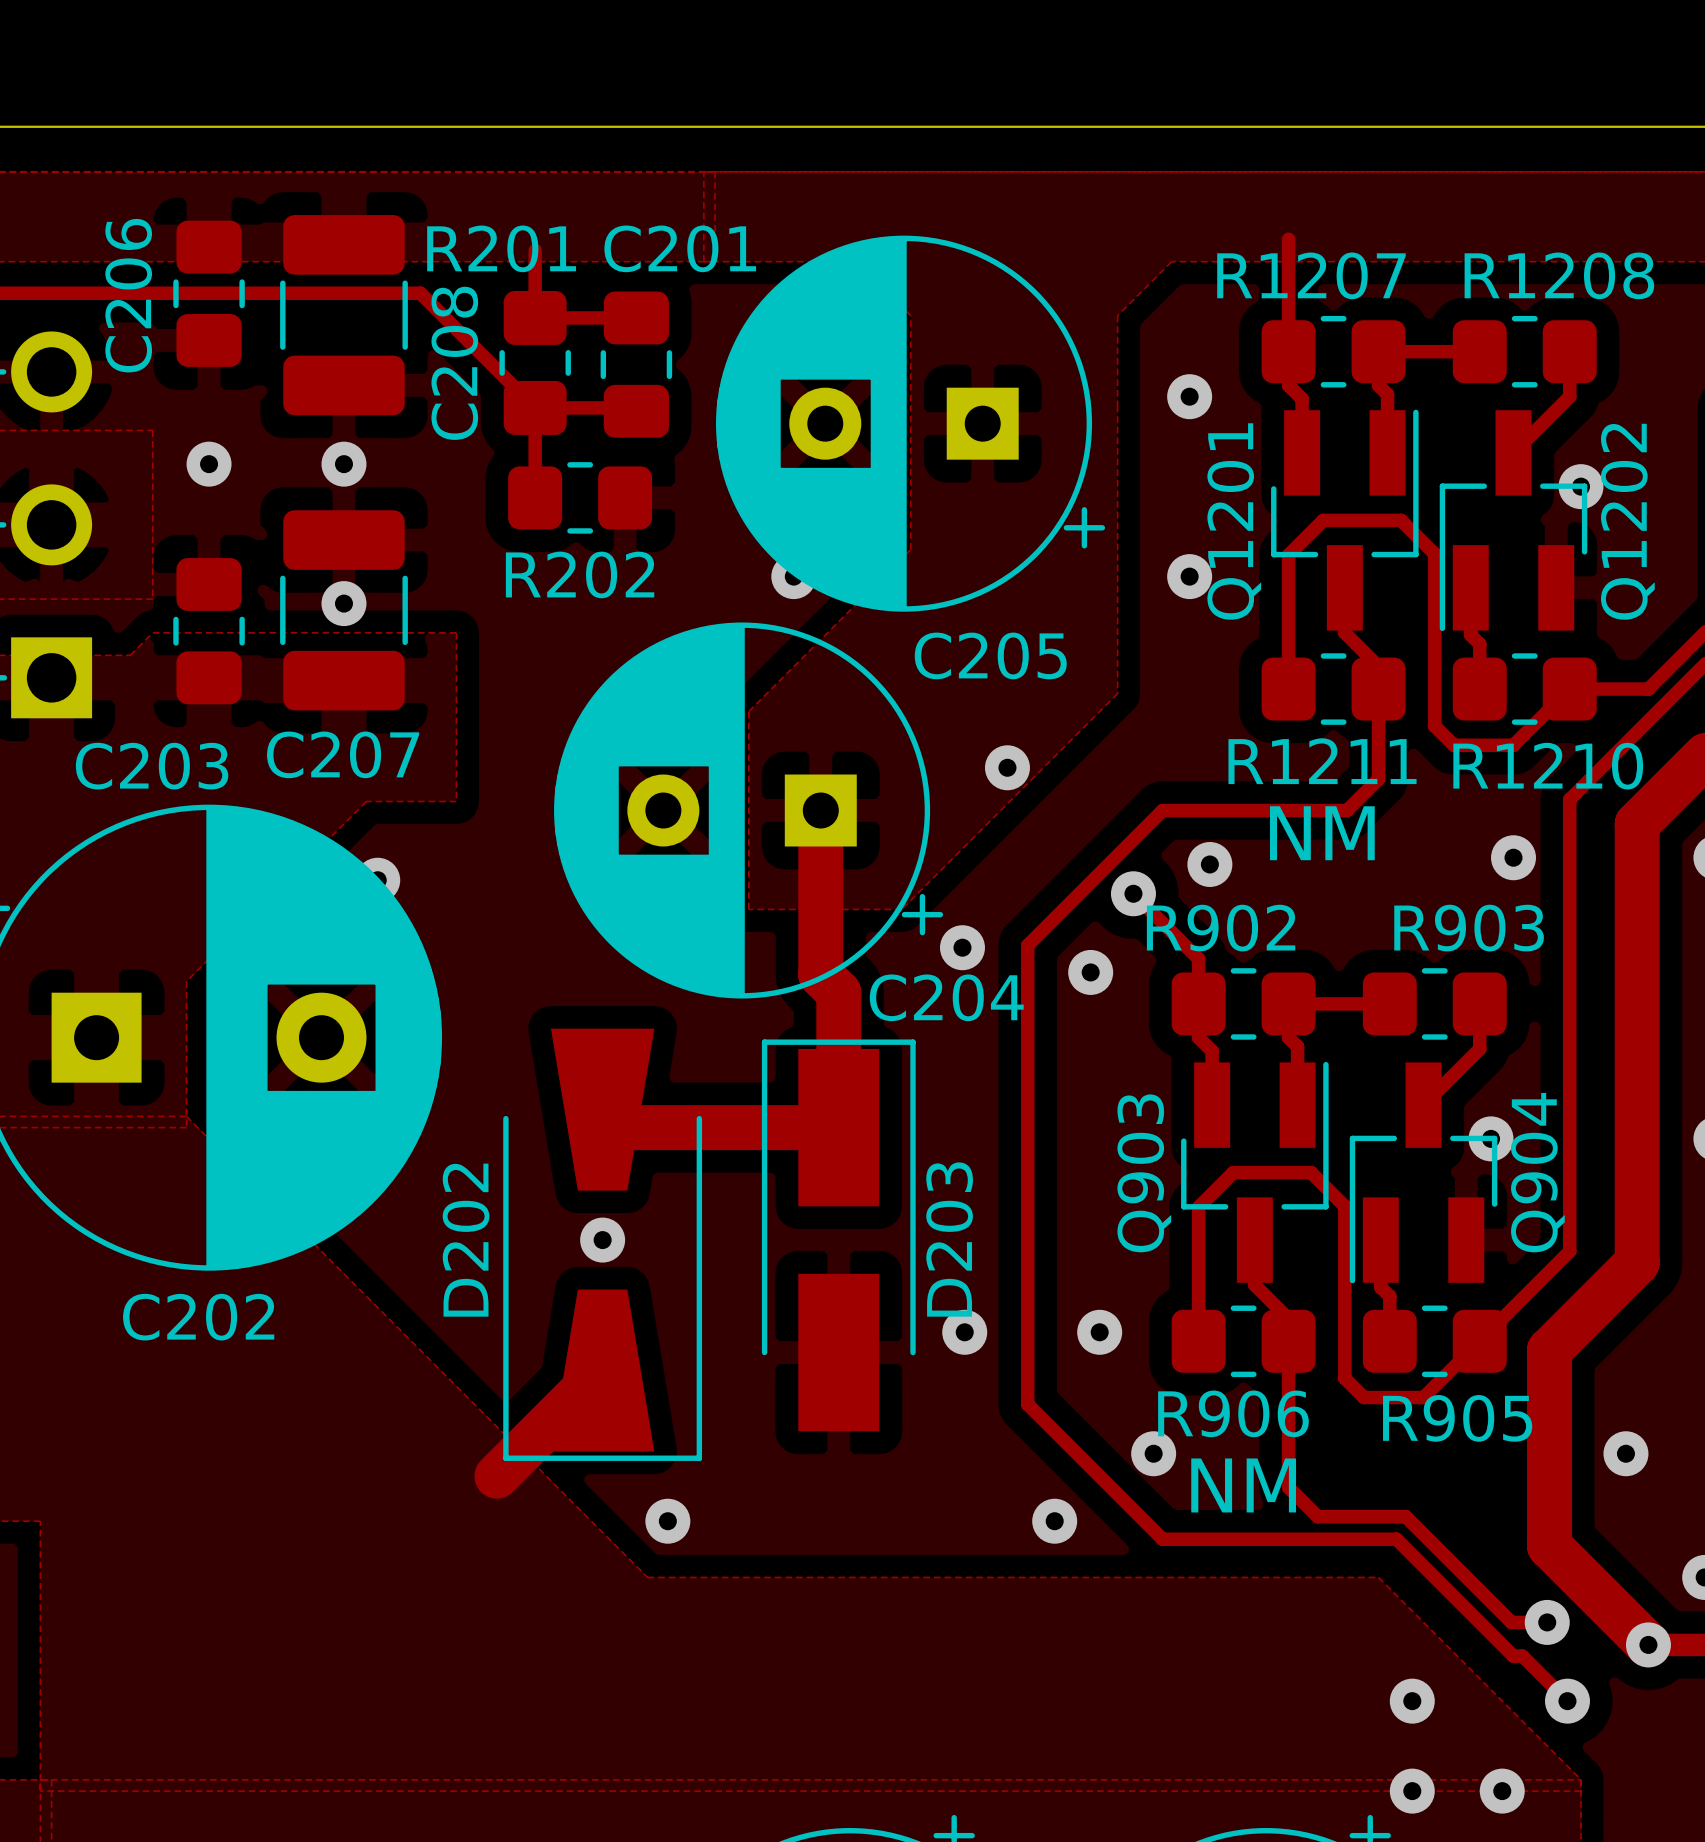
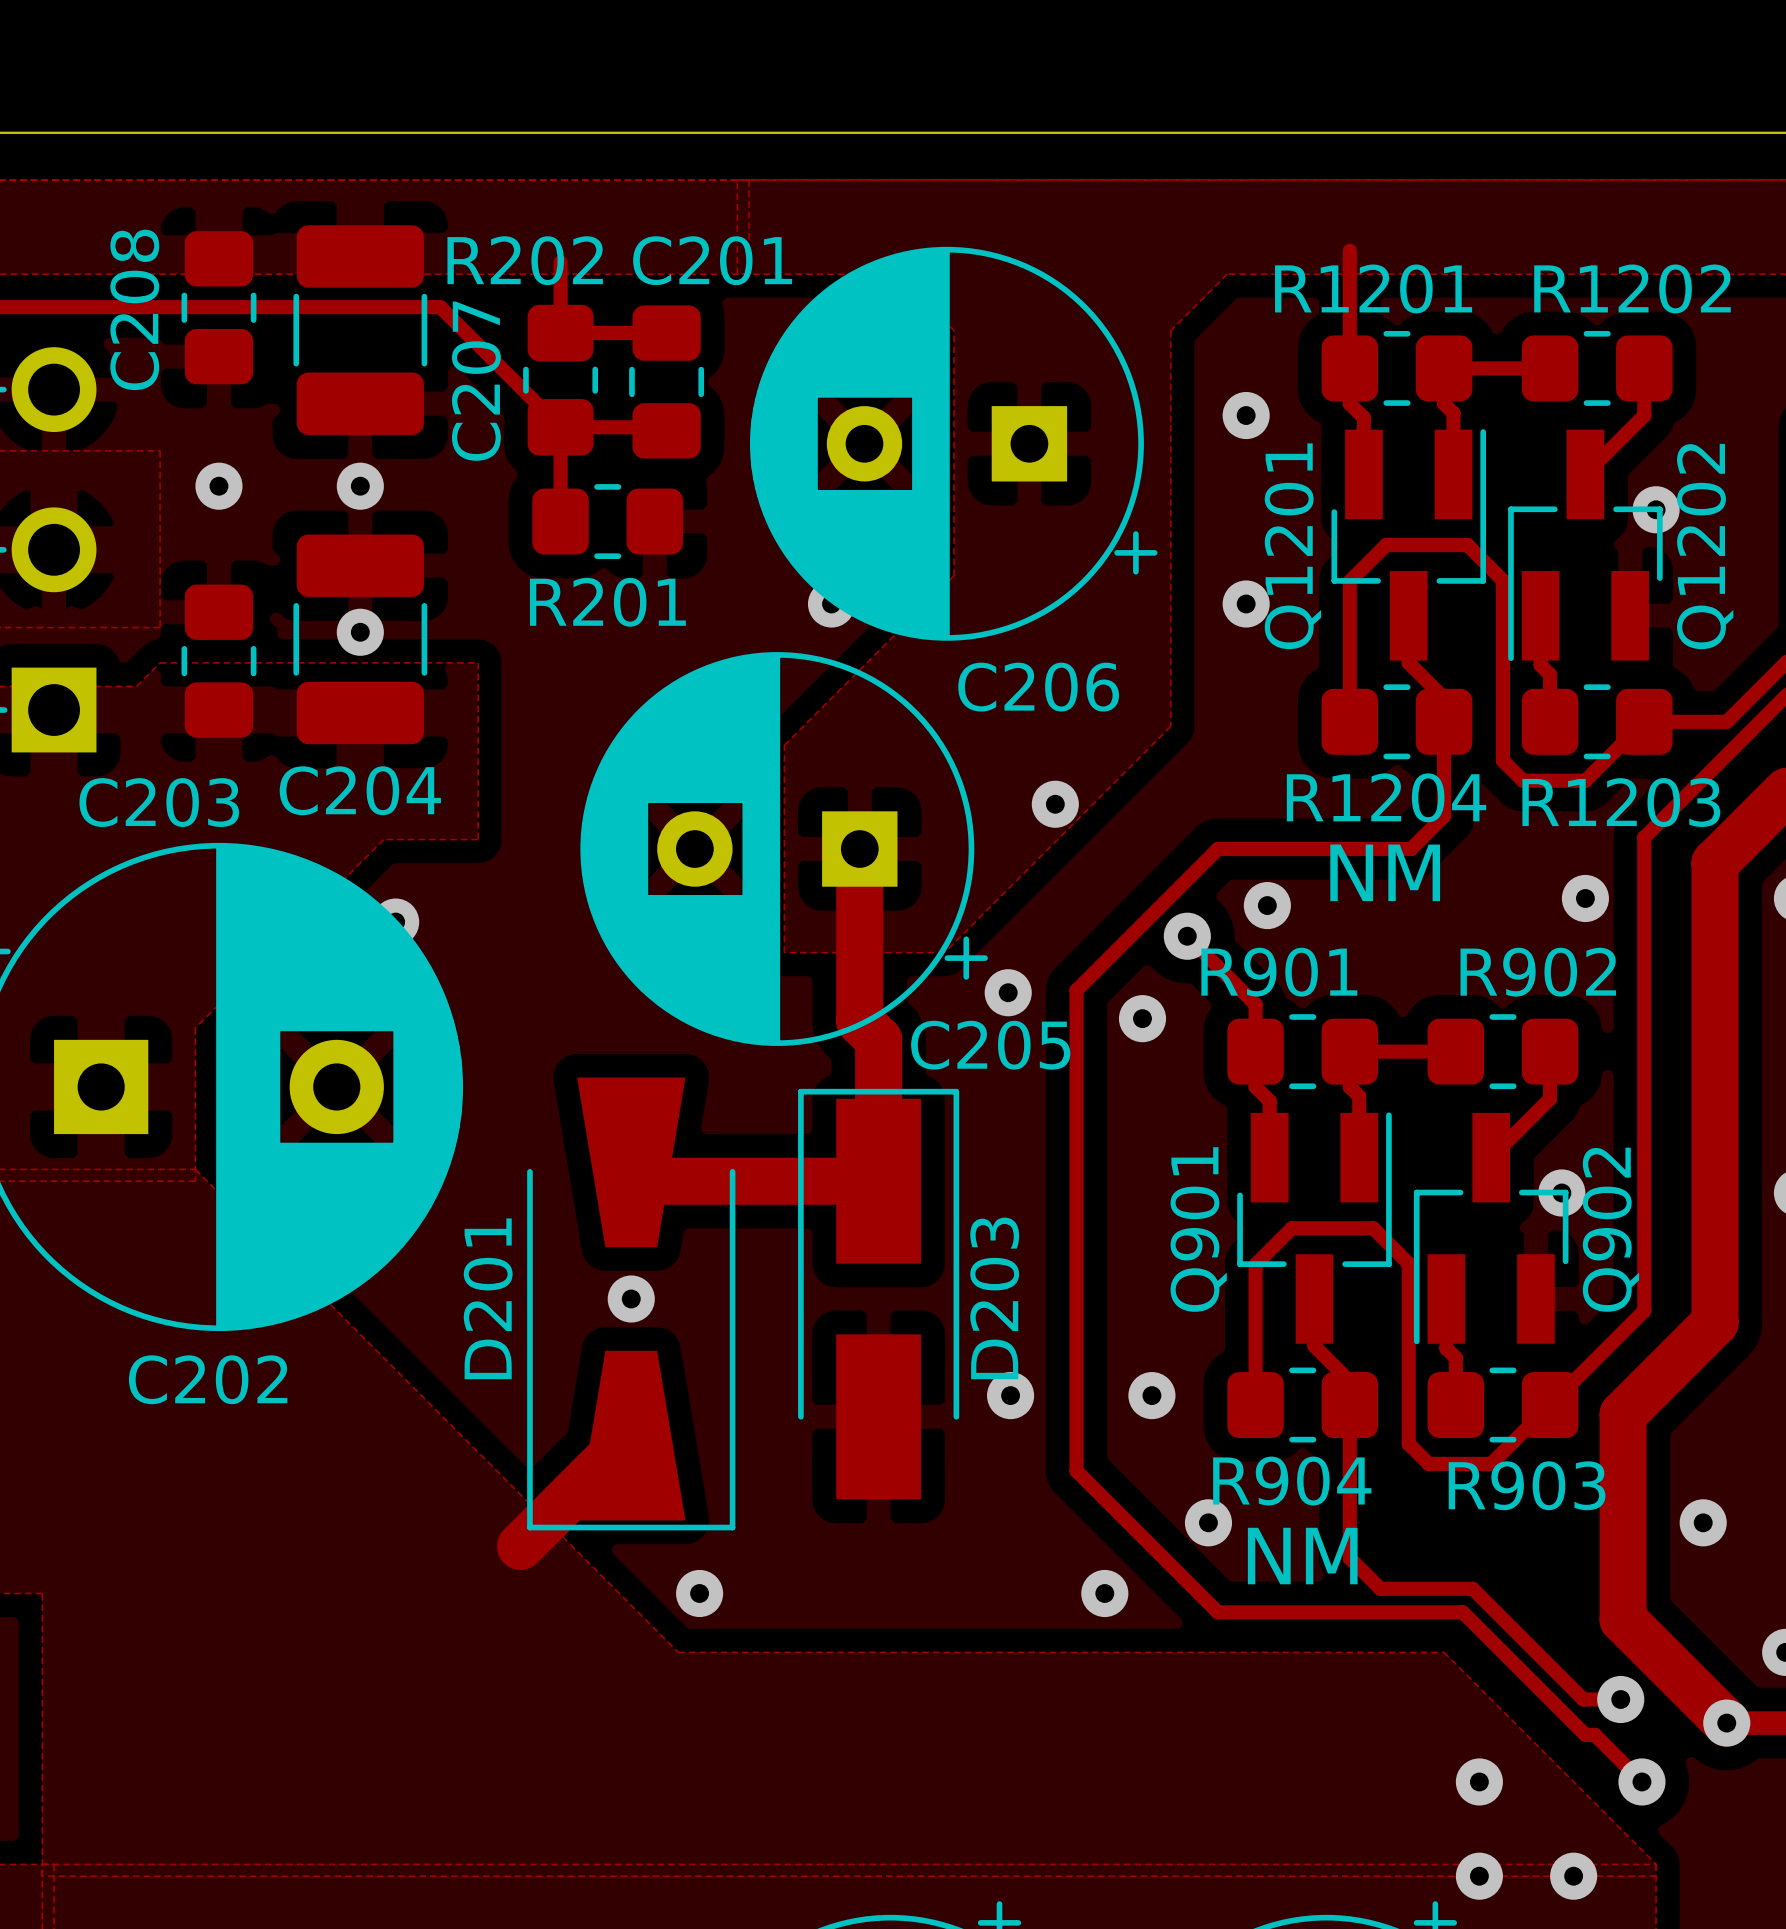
R201 name: R201 (501, 248) -> R202 (525, 260)
R1207 name: R1207 (1311, 275) -> R1201 (1373, 288)
R1208 name: R1208 (1559, 275) -> R1202 (1632, 288)
C206 name: C206 (128, 295) -> C208 (134, 309)
C208 name: C208 (454, 363) -> C207 (476, 381)
R202 name: R202 (580, 574) -> R201 (607, 602)
C205 name: C205 (990, 655) -> C206 (1038, 687)
C207 name: C207 (343, 754) -> C204 (360, 790)
R1211 name: R1211 (1322, 761) -> R1204 (1386, 797)
R1210 name: R1210 (1548, 766) -> R1203 (1621, 802)
R902 name: R902 (1221, 928) -> R901 (1279, 972)
R903 name: R903 (1469, 928) -> R902 (1538, 972)
C204 name: C204 (946, 997) -> C205 (990, 1045)
Q904 name: Q904 (1537, 1172) -> Q902 (1610, 1229)
Q903 name: Q903 (1144, 1173) -> Q901 (1198, 1229)
D202 name: D202 (466, 1240) -> D201 (488, 1298)
R906 name: R906 (1233, 1413) -> R904 (1292, 1481)
R905 name: R905 (1457, 1418) -> R903 (1527, 1485)

